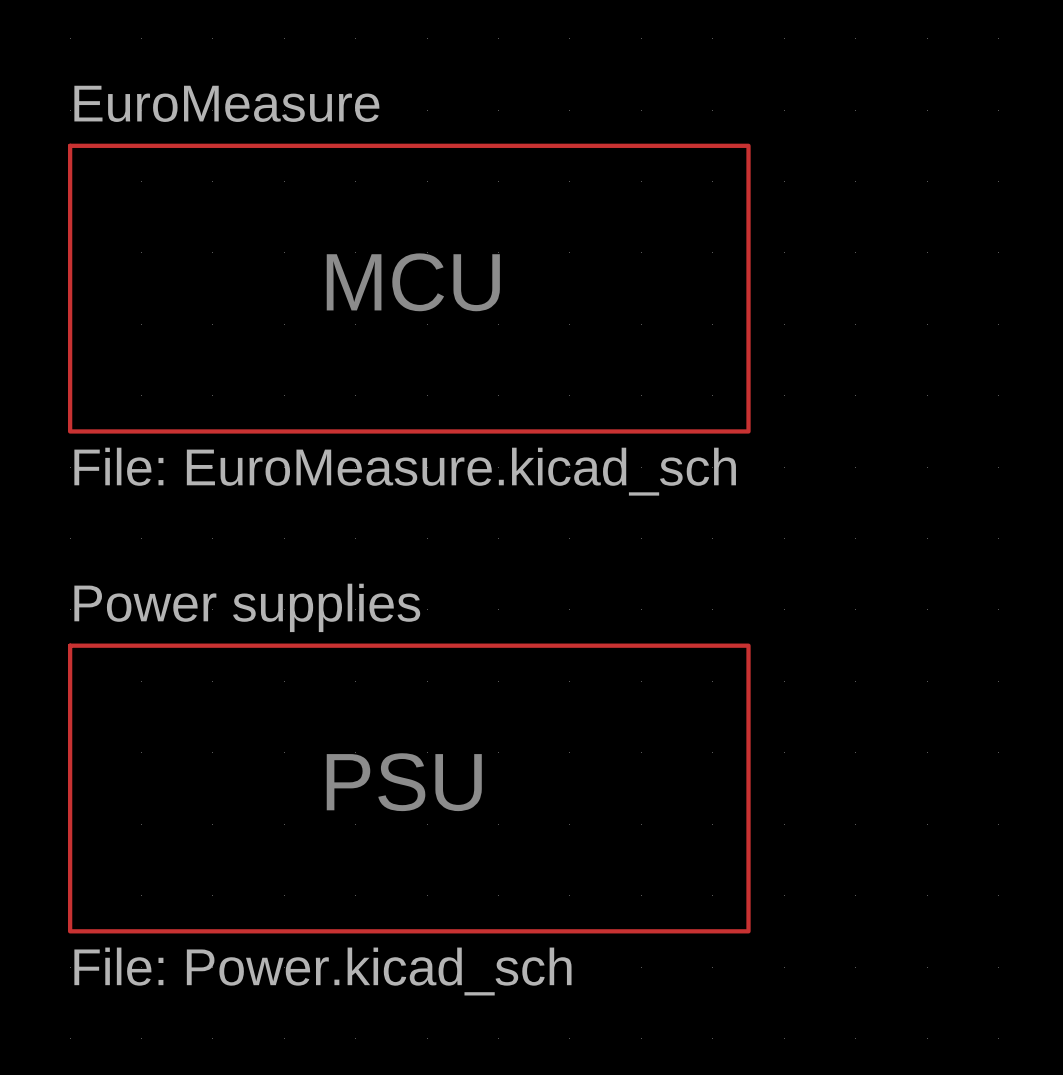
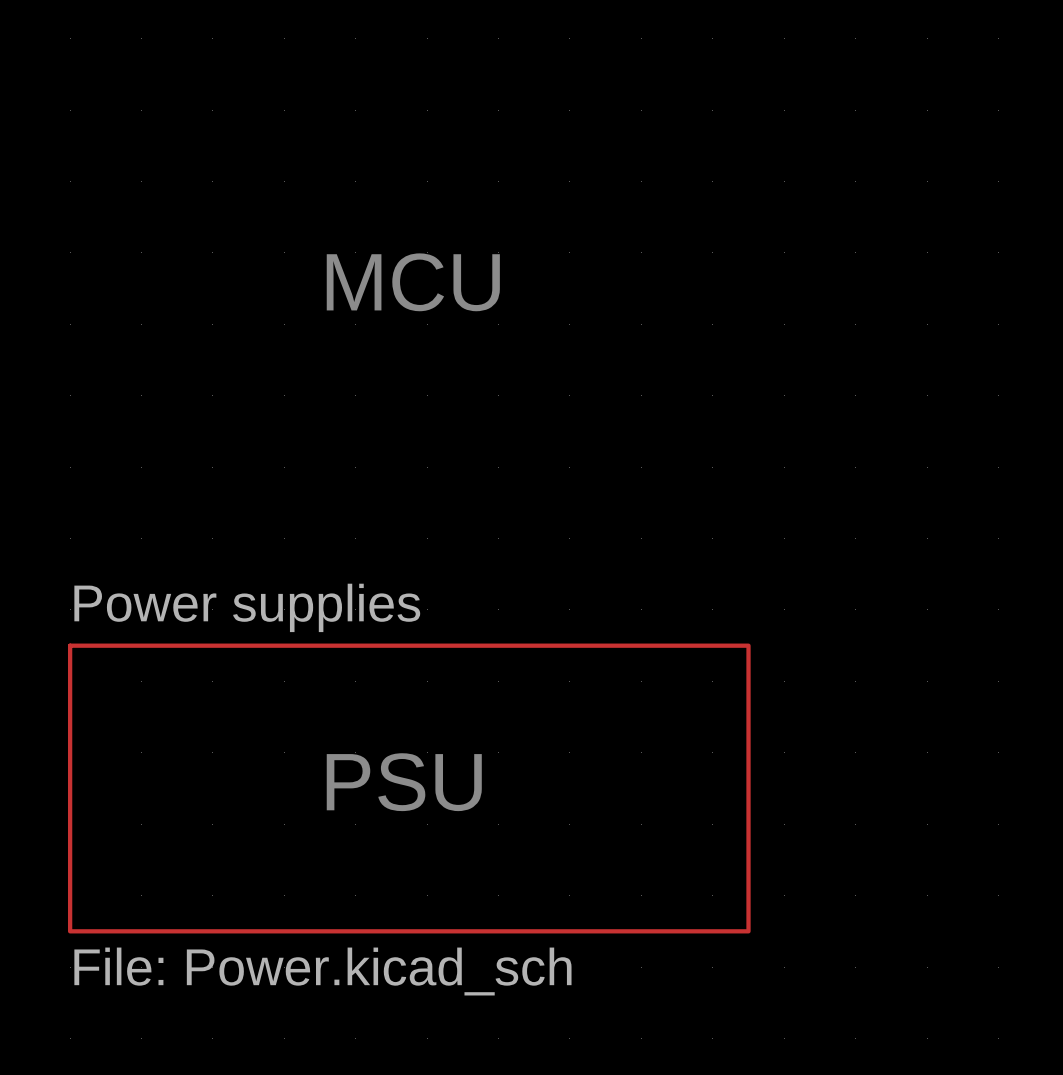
sheet EuroMeasure: File: EuroMeasure.kicad_sch (409, 288) -> none

